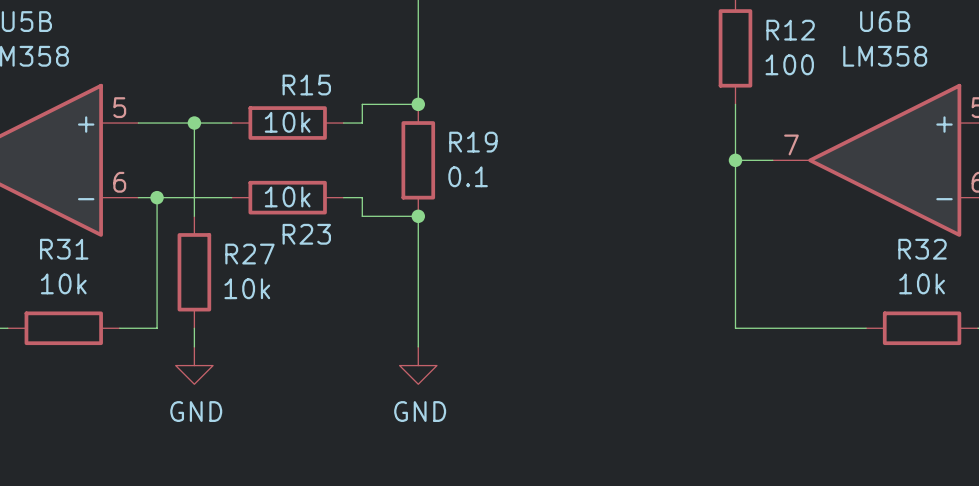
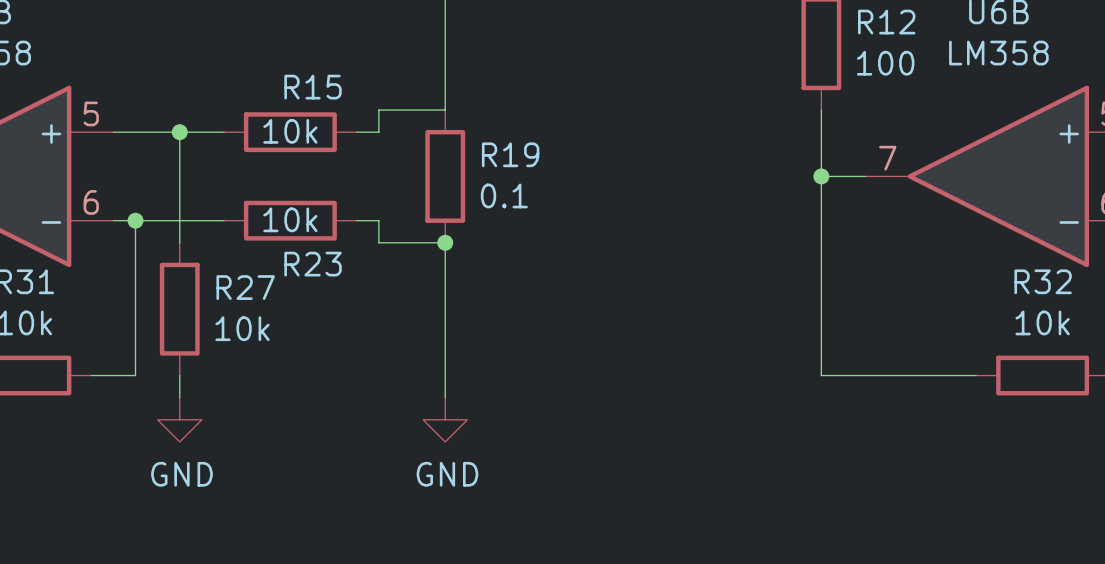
junction: (418, 104) -> none

